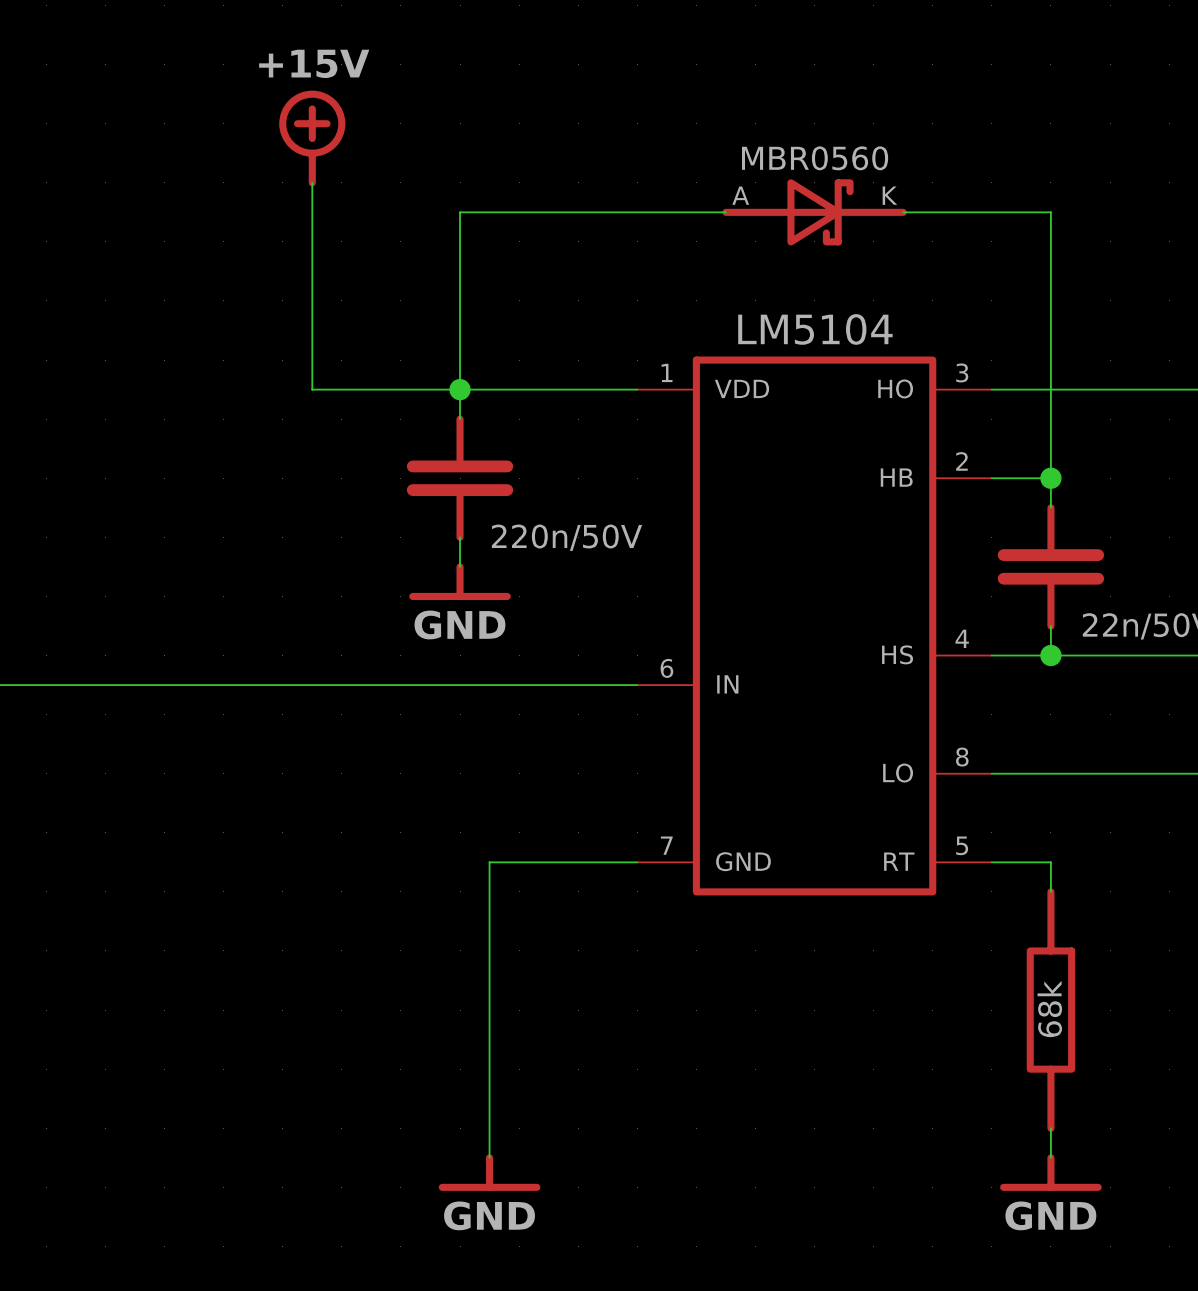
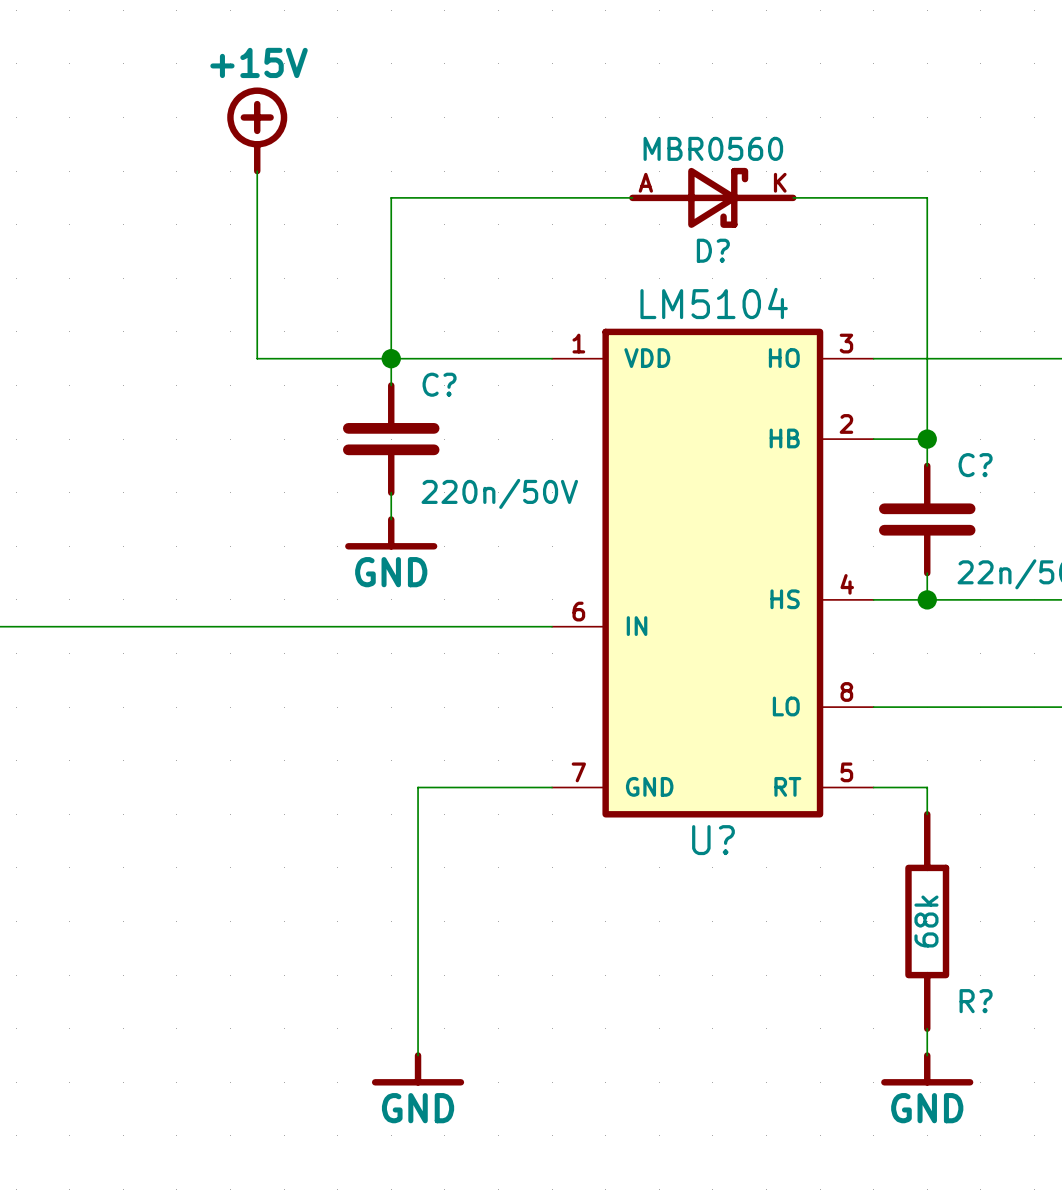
D? name: none -> D? (713, 250)
C? name: none -> C? (439, 384)
C? name: none -> C? (975, 465)
U? name: none -> U? (713, 840)
R? name: none -> R? (976, 1001)

